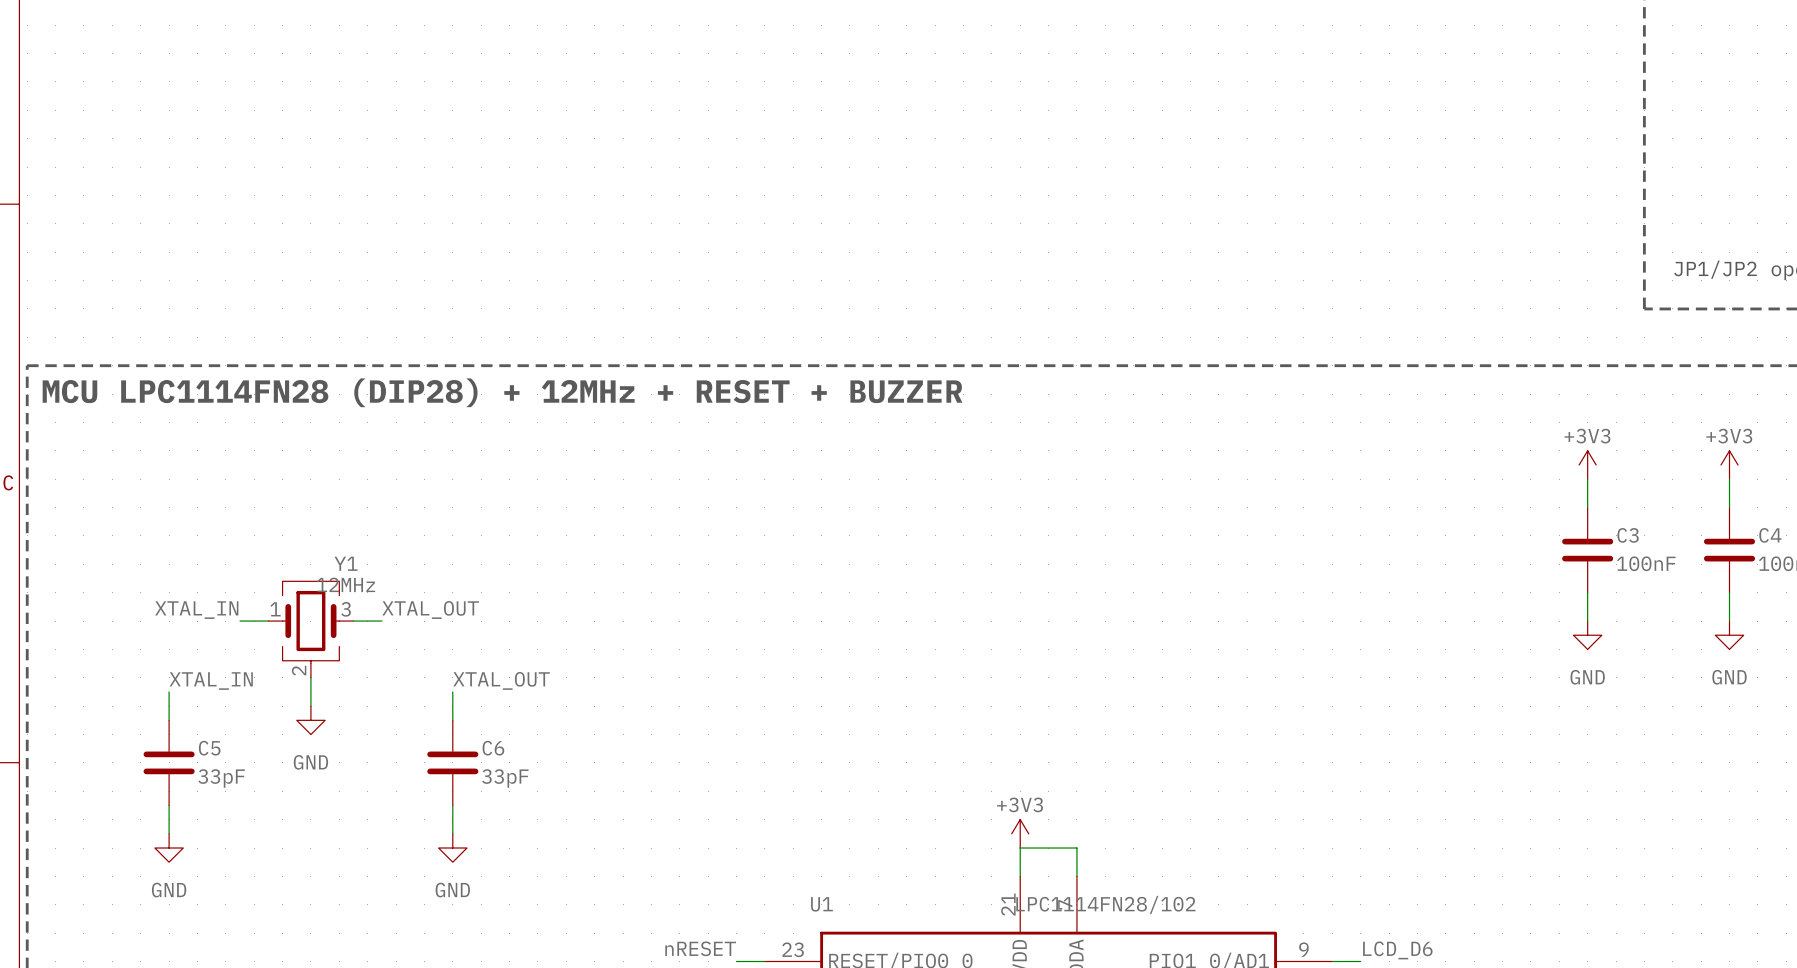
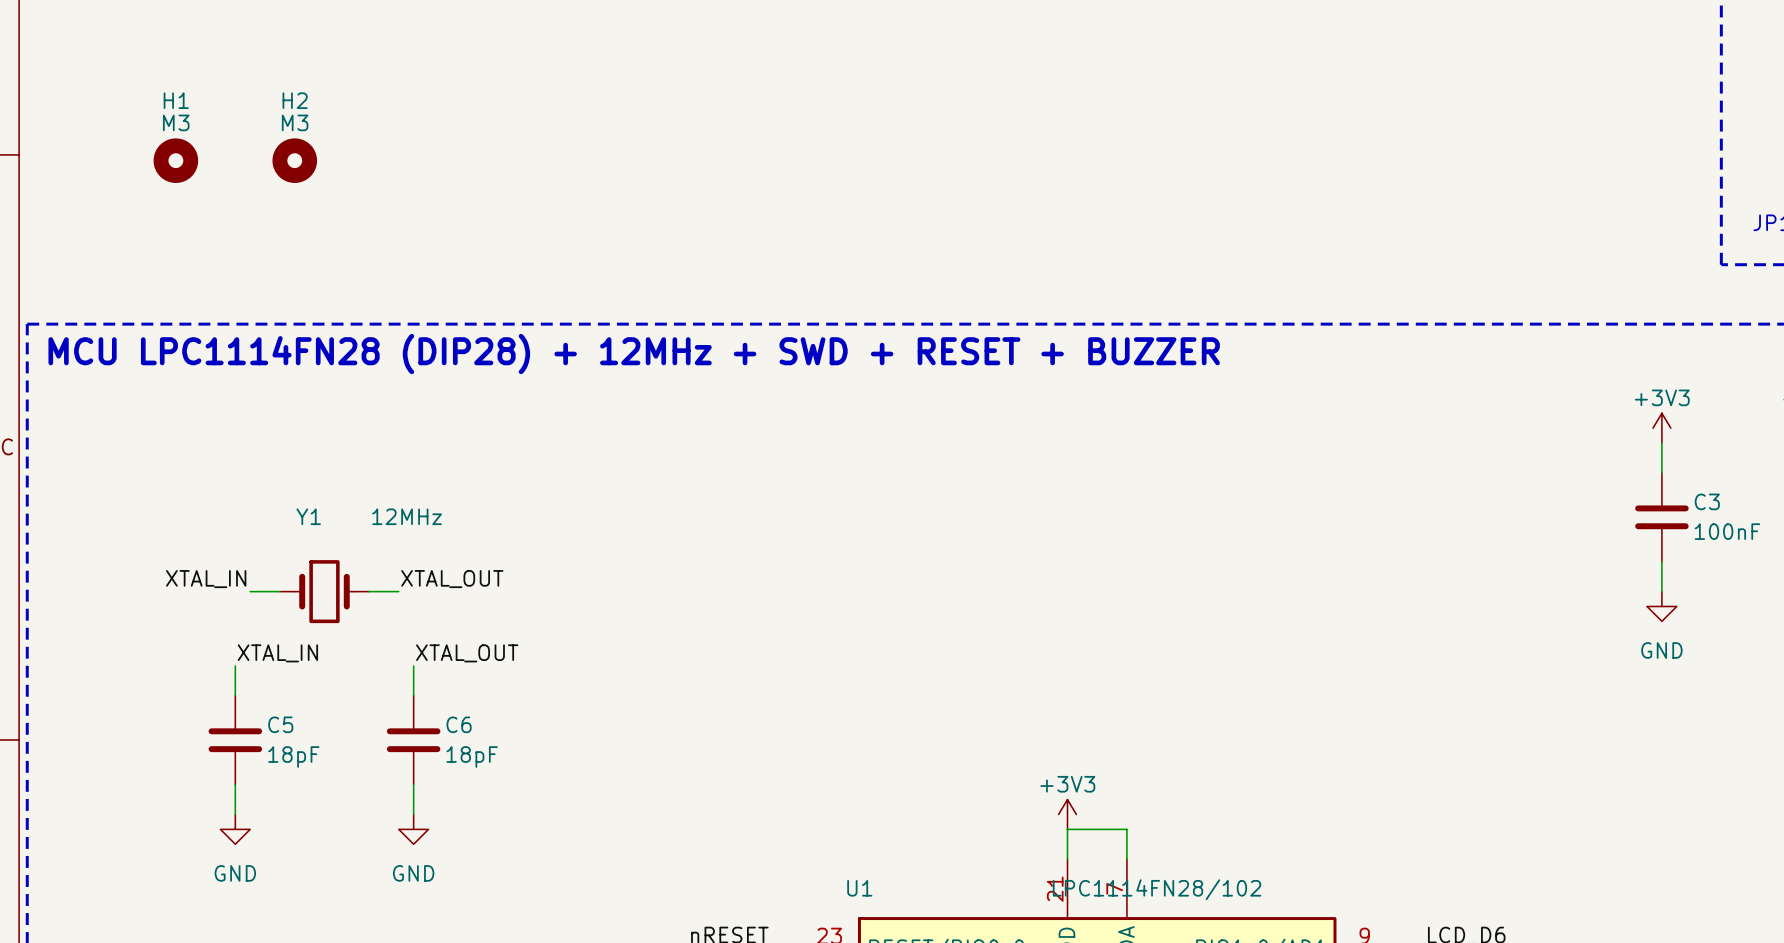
H1: none -> M3 (175, 160)
H2: none -> M3 (294, 160)
text: MCU LPC1114FN28 (DIP28) + 12MHz + RESET + BUZZER (502, 392) -> MCU LPC1114FN28 (DIP28) + 12MHz + SWD + RESET + BUZZER (634, 354)
Y1 name position: Y1 (346, 563) -> Y1 (308, 516)
Y1 symbol: [268, 581, 354, 678] -> [279, 560, 370, 624]
Y1 value position: 12MHz (346, 584) -> 12MHz (407, 516)
wire: (310, 677) (310, 706) -> none
label position: XTAL_OUT (501, 680) -> XTAL_OUT (467, 653)
label position: XTAL_IN (211, 681) -> XTAL_IN (277, 653)
wire: (169, 691) (169, 720) -> (235, 665) (235, 695)
wire: (452, 691) (452, 720) -> (413, 665) (413, 695)
power symbol: GND (310, 720) -> none
C5 position: (169, 762) -> (235, 740)
C6 position: (452, 762) -> (413, 740)
C5 value: 33pF (221, 778) -> 18pF (293, 757)
C6 value: 33pF (505, 778) -> 18pF (472, 757)
wire: (169, 805) (169, 833) -> (235, 784) (235, 814)
wire: (452, 805) (452, 833) -> (413, 784) (413, 814)
power symbol position: GND (169, 848) -> GND (235, 829)
power symbol position: GND (452, 848) -> GND (413, 829)

